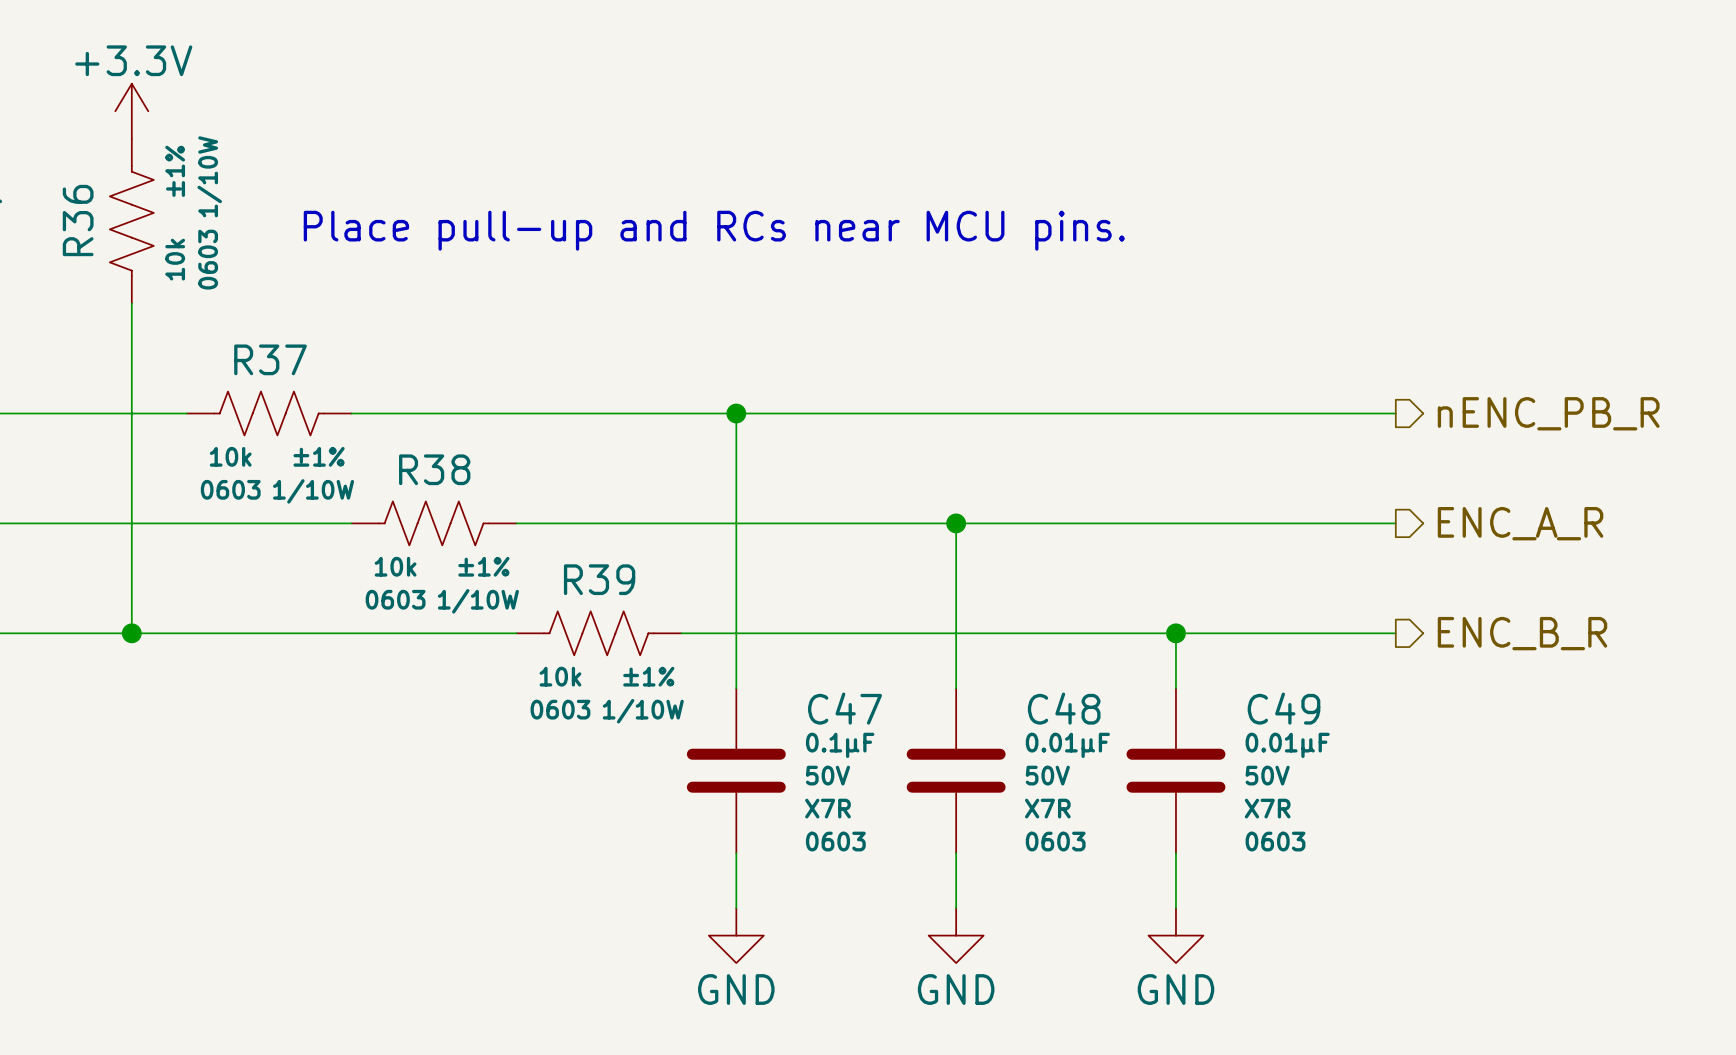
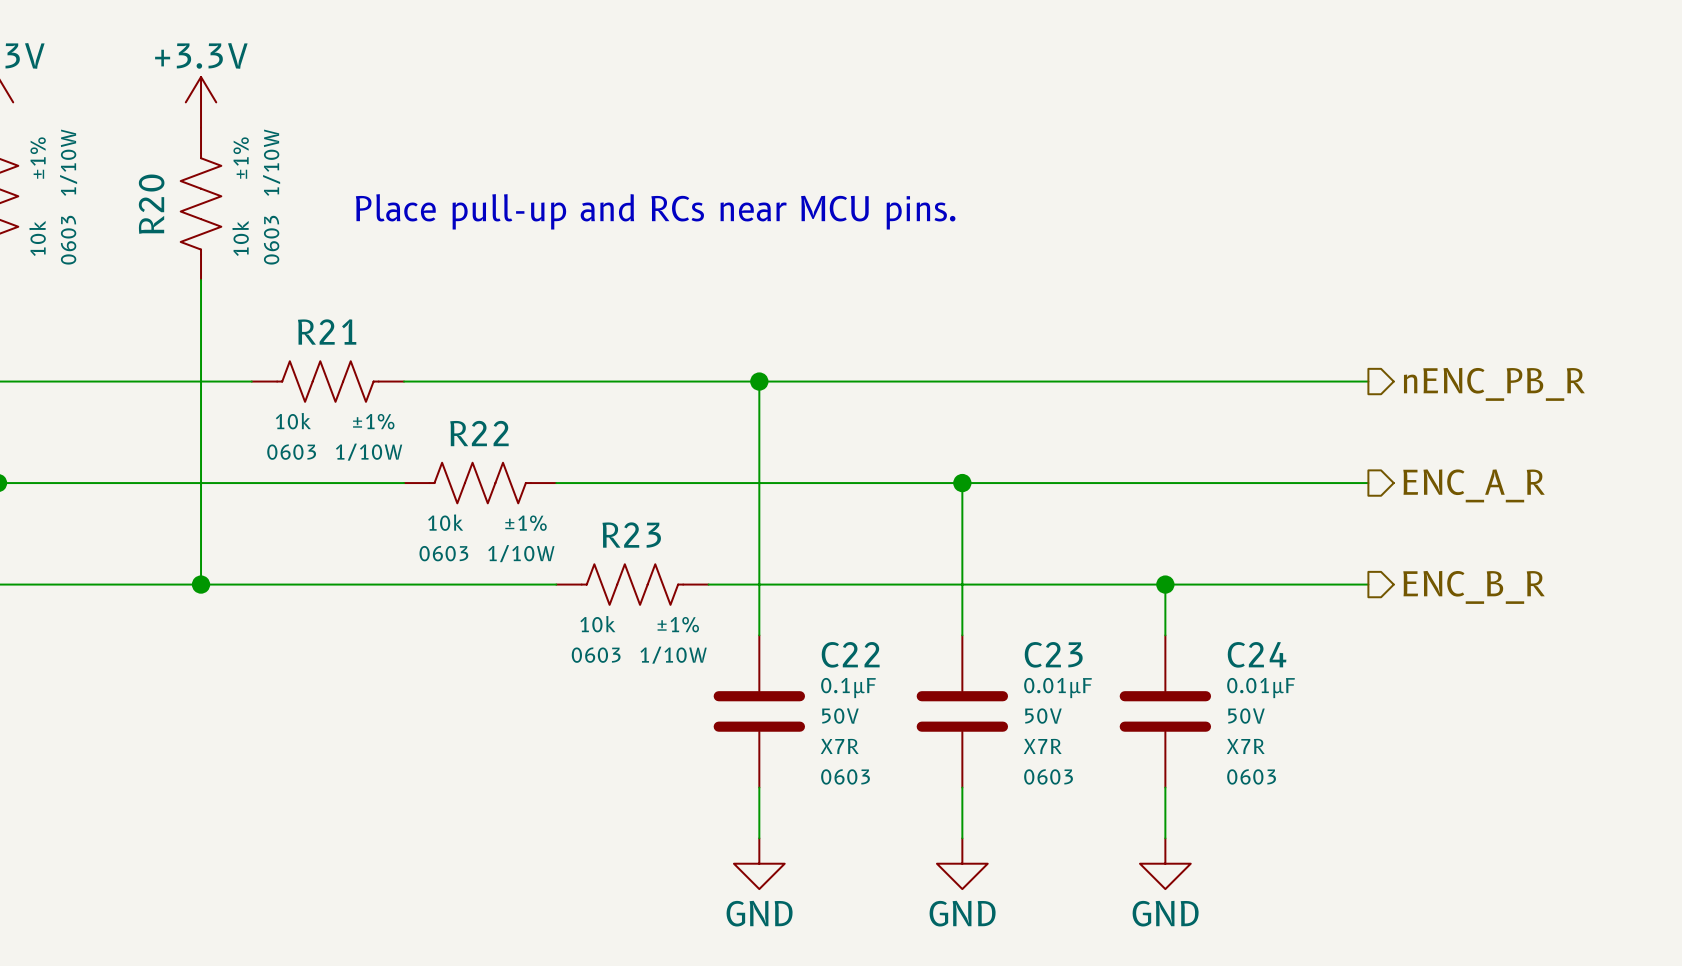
R36 name: R36 (78, 220) -> R20 (151, 204)
R37 name: R37 (270, 359) -> R21 (327, 331)
R38 name: R38 (434, 469) -> R22 (479, 433)
R39 name: R39 (599, 579) -> R23 (631, 535)
C47 name: C47 (845, 708) -> C22 (850, 654)
C48 name: C48 (1064, 708) -> C23 (1053, 654)
C49 name: C49 (1284, 708) -> C24 (1257, 654)

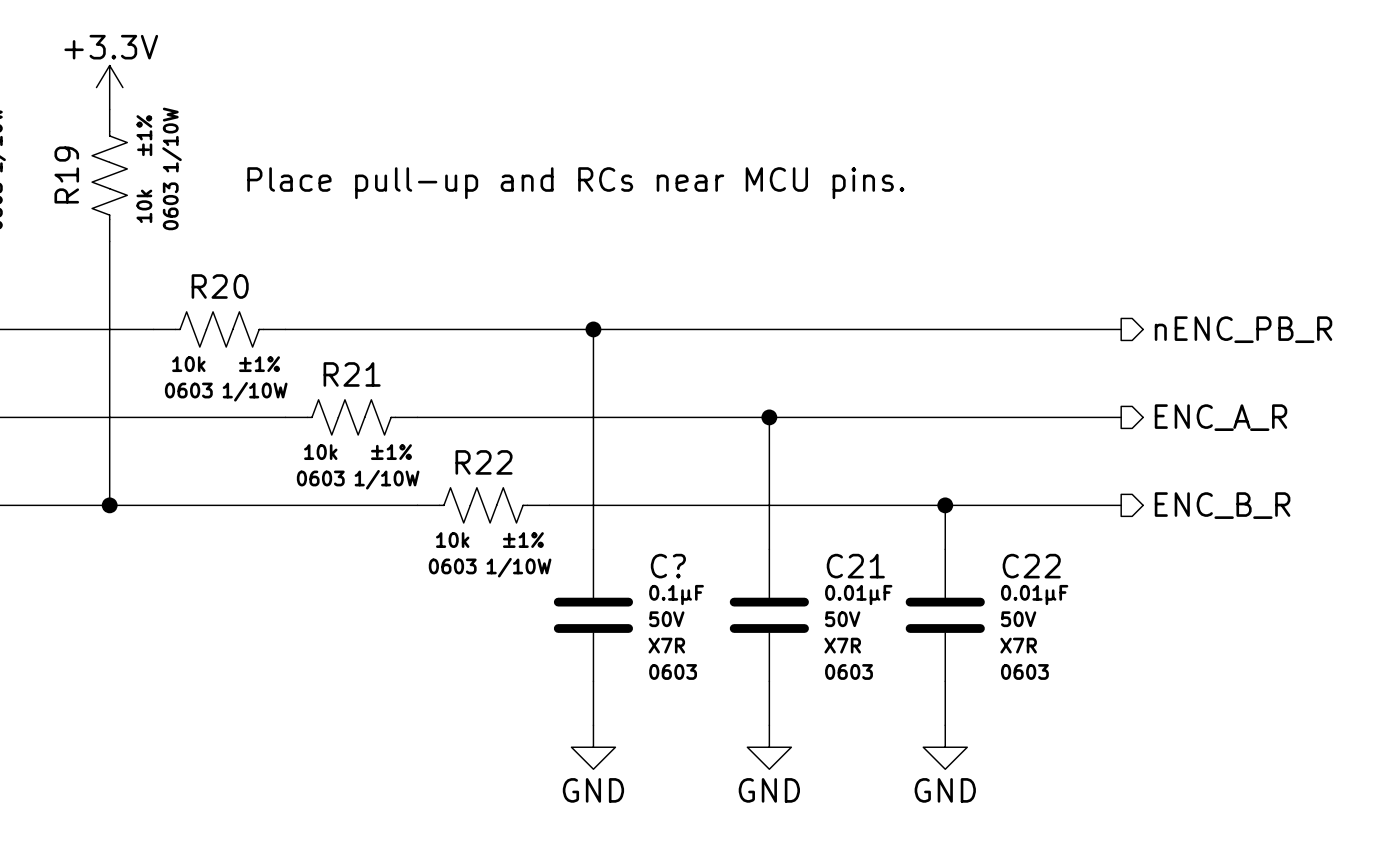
R20 name: R20 (151, 204) -> R19 (66, 175)
R21 name: R21 (327, 331) -> R20 (220, 286)
R22 name: R22 (479, 433) -> R21 (352, 374)
R23 name: R23 (631, 535) -> R22 (484, 462)
C22 name: C22 (850, 654) -> C? (668, 566)
C23 name: C23 (1053, 654) -> C21 (855, 566)
C24 name: C24 (1257, 654) -> C22 (1031, 566)

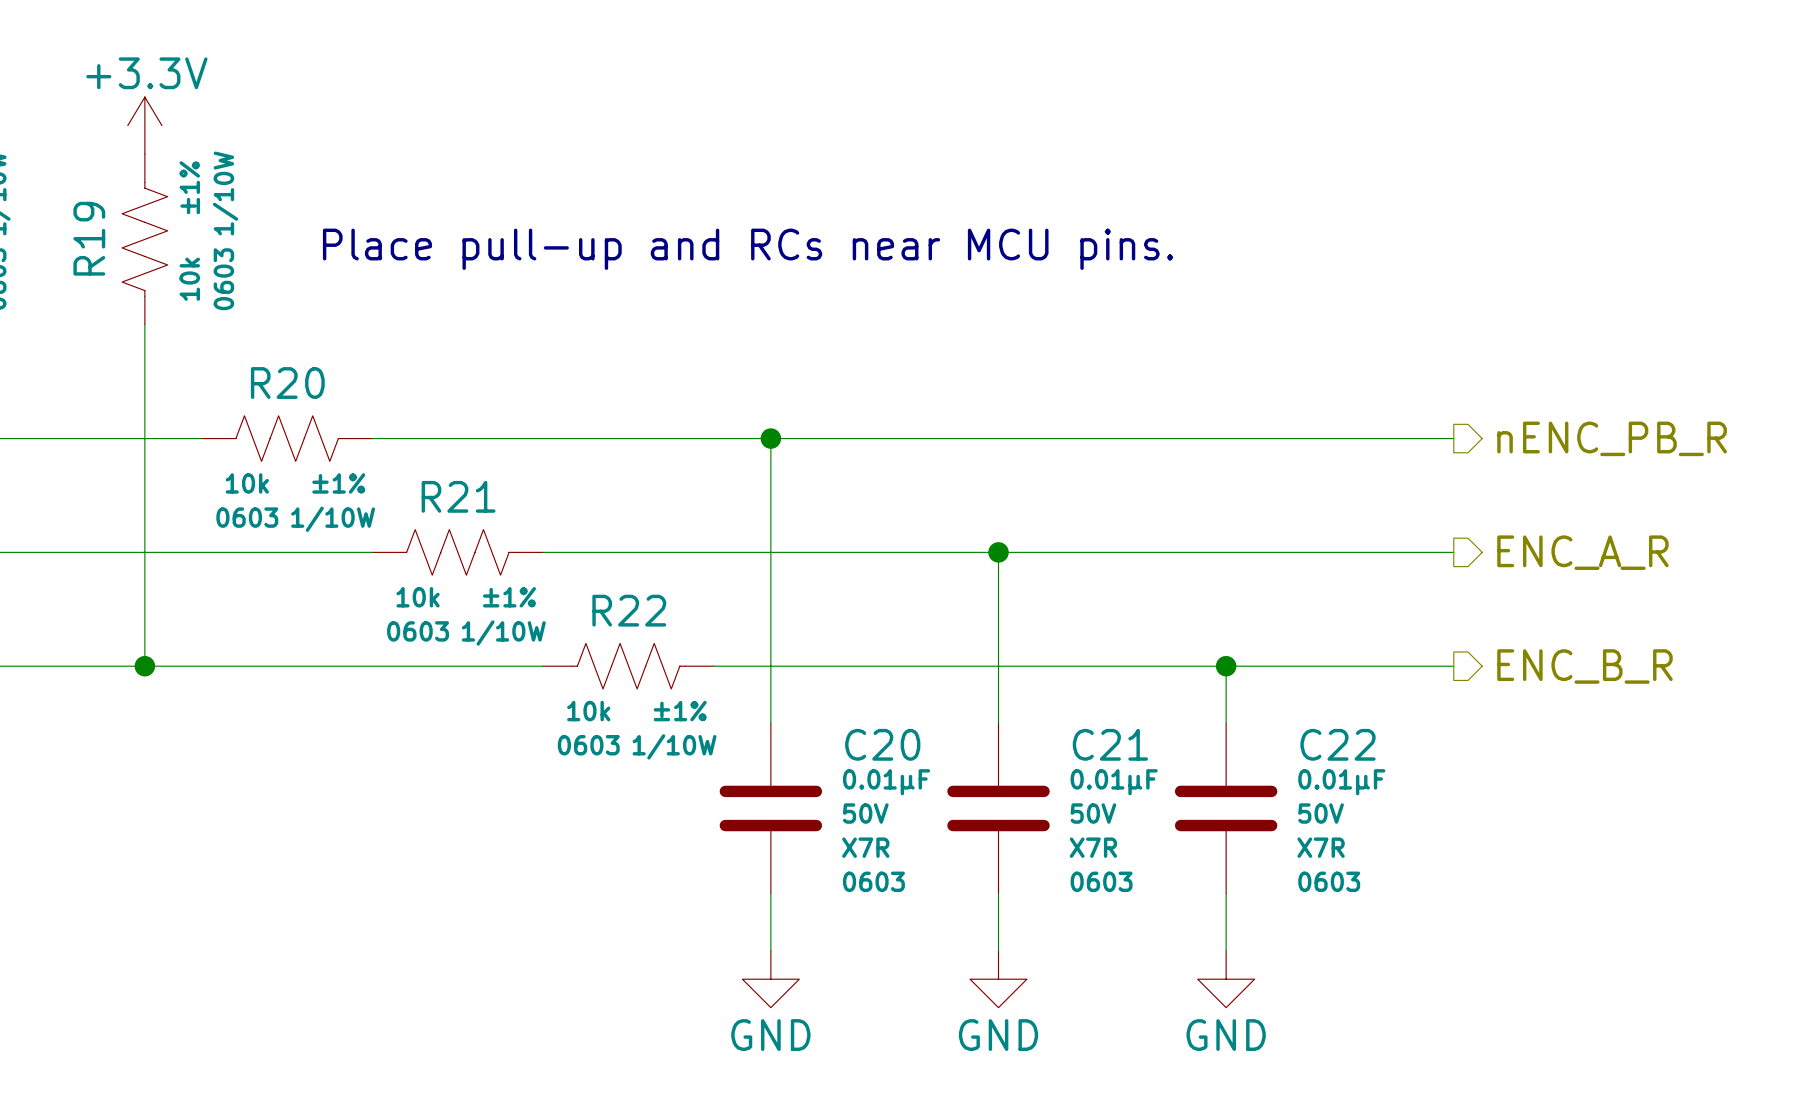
C? name: C? (668, 566) -> C20 (882, 744)
C? text: 0.1µF (676, 595) -> 0.01µF (886, 782)

